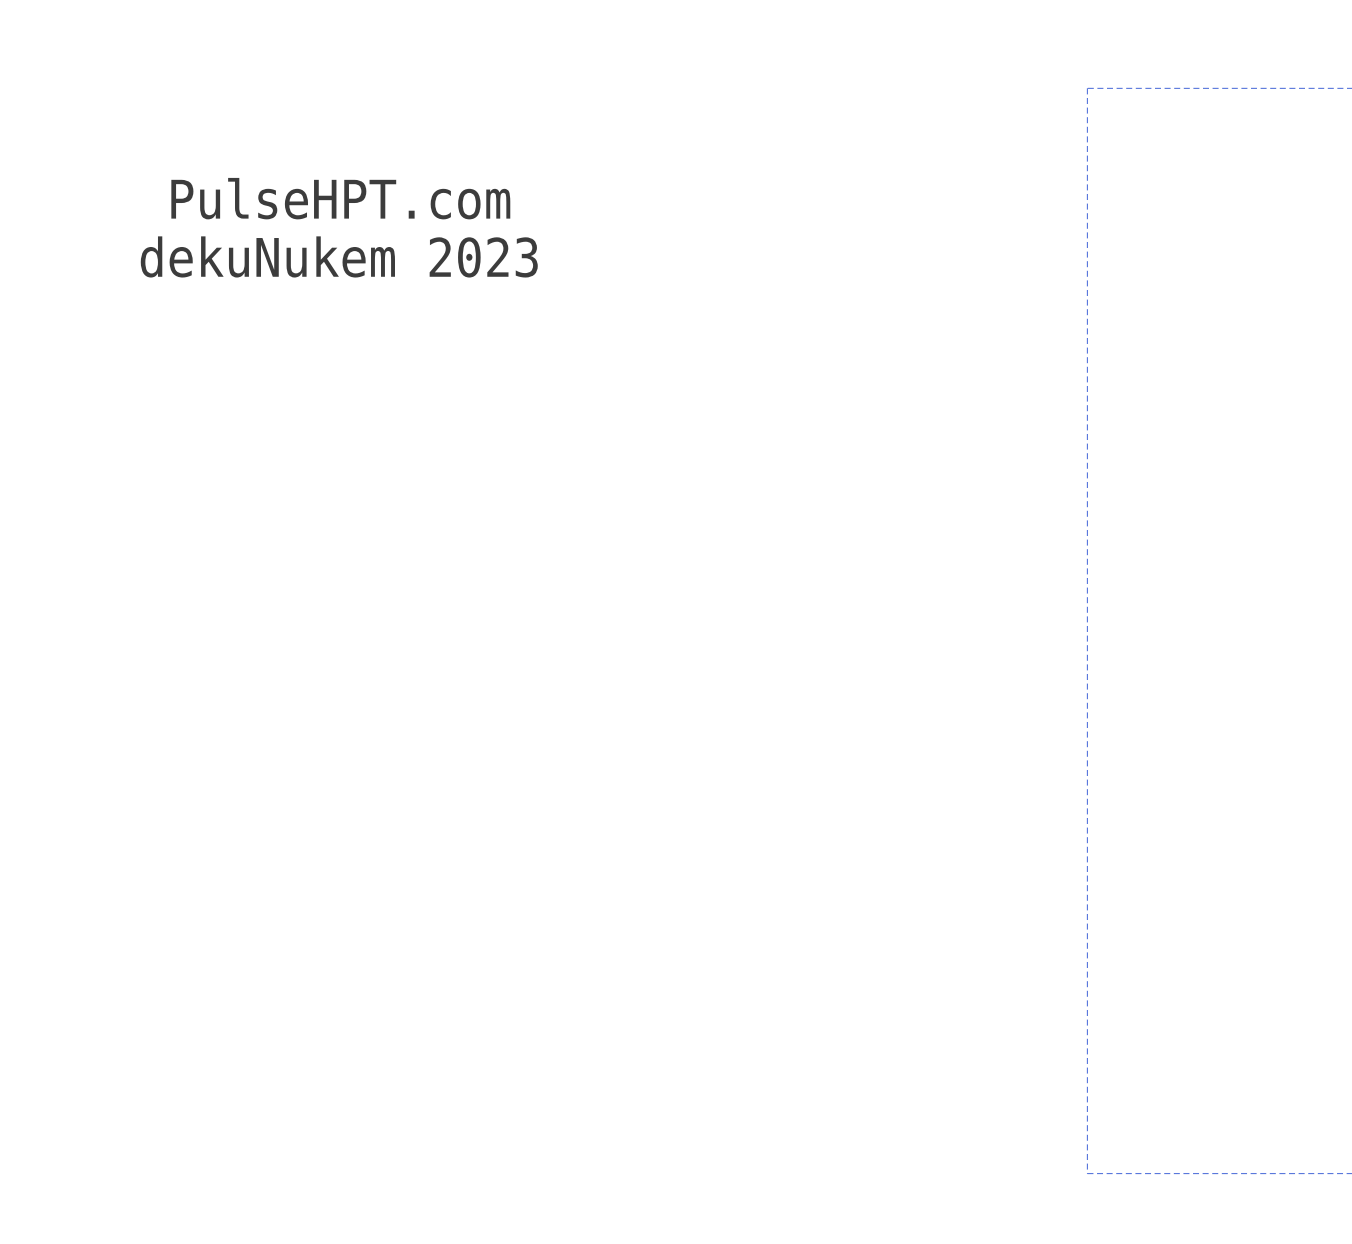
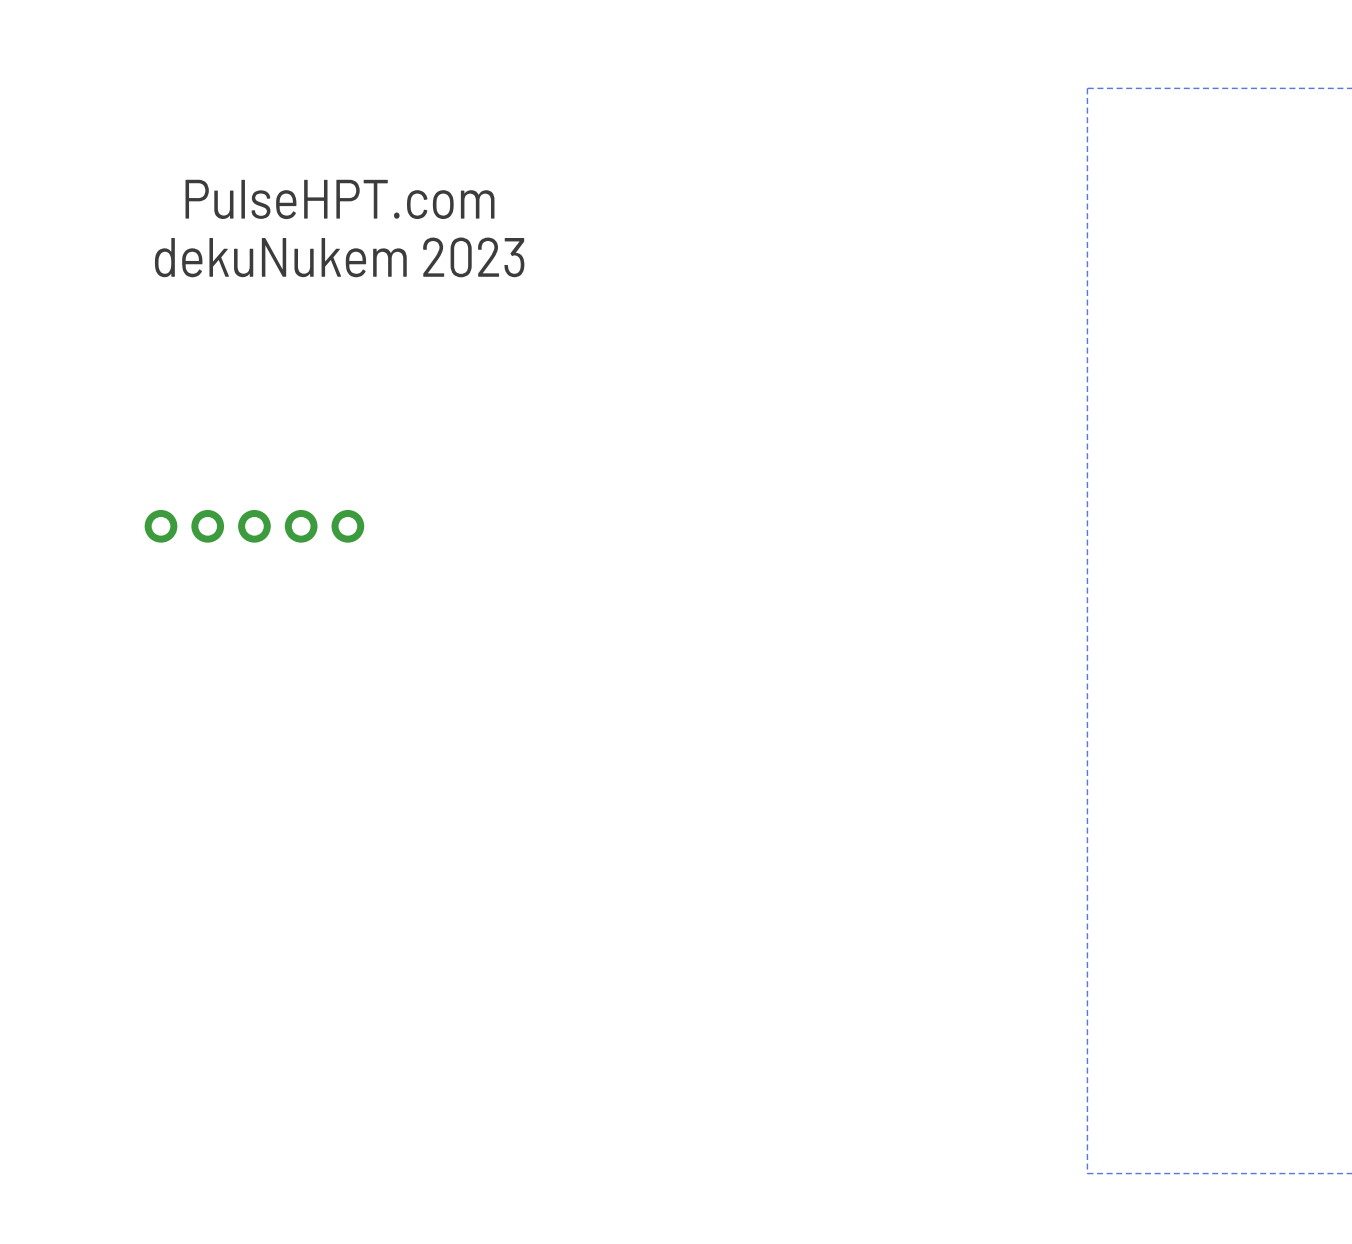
part: none -> (254, 526)

